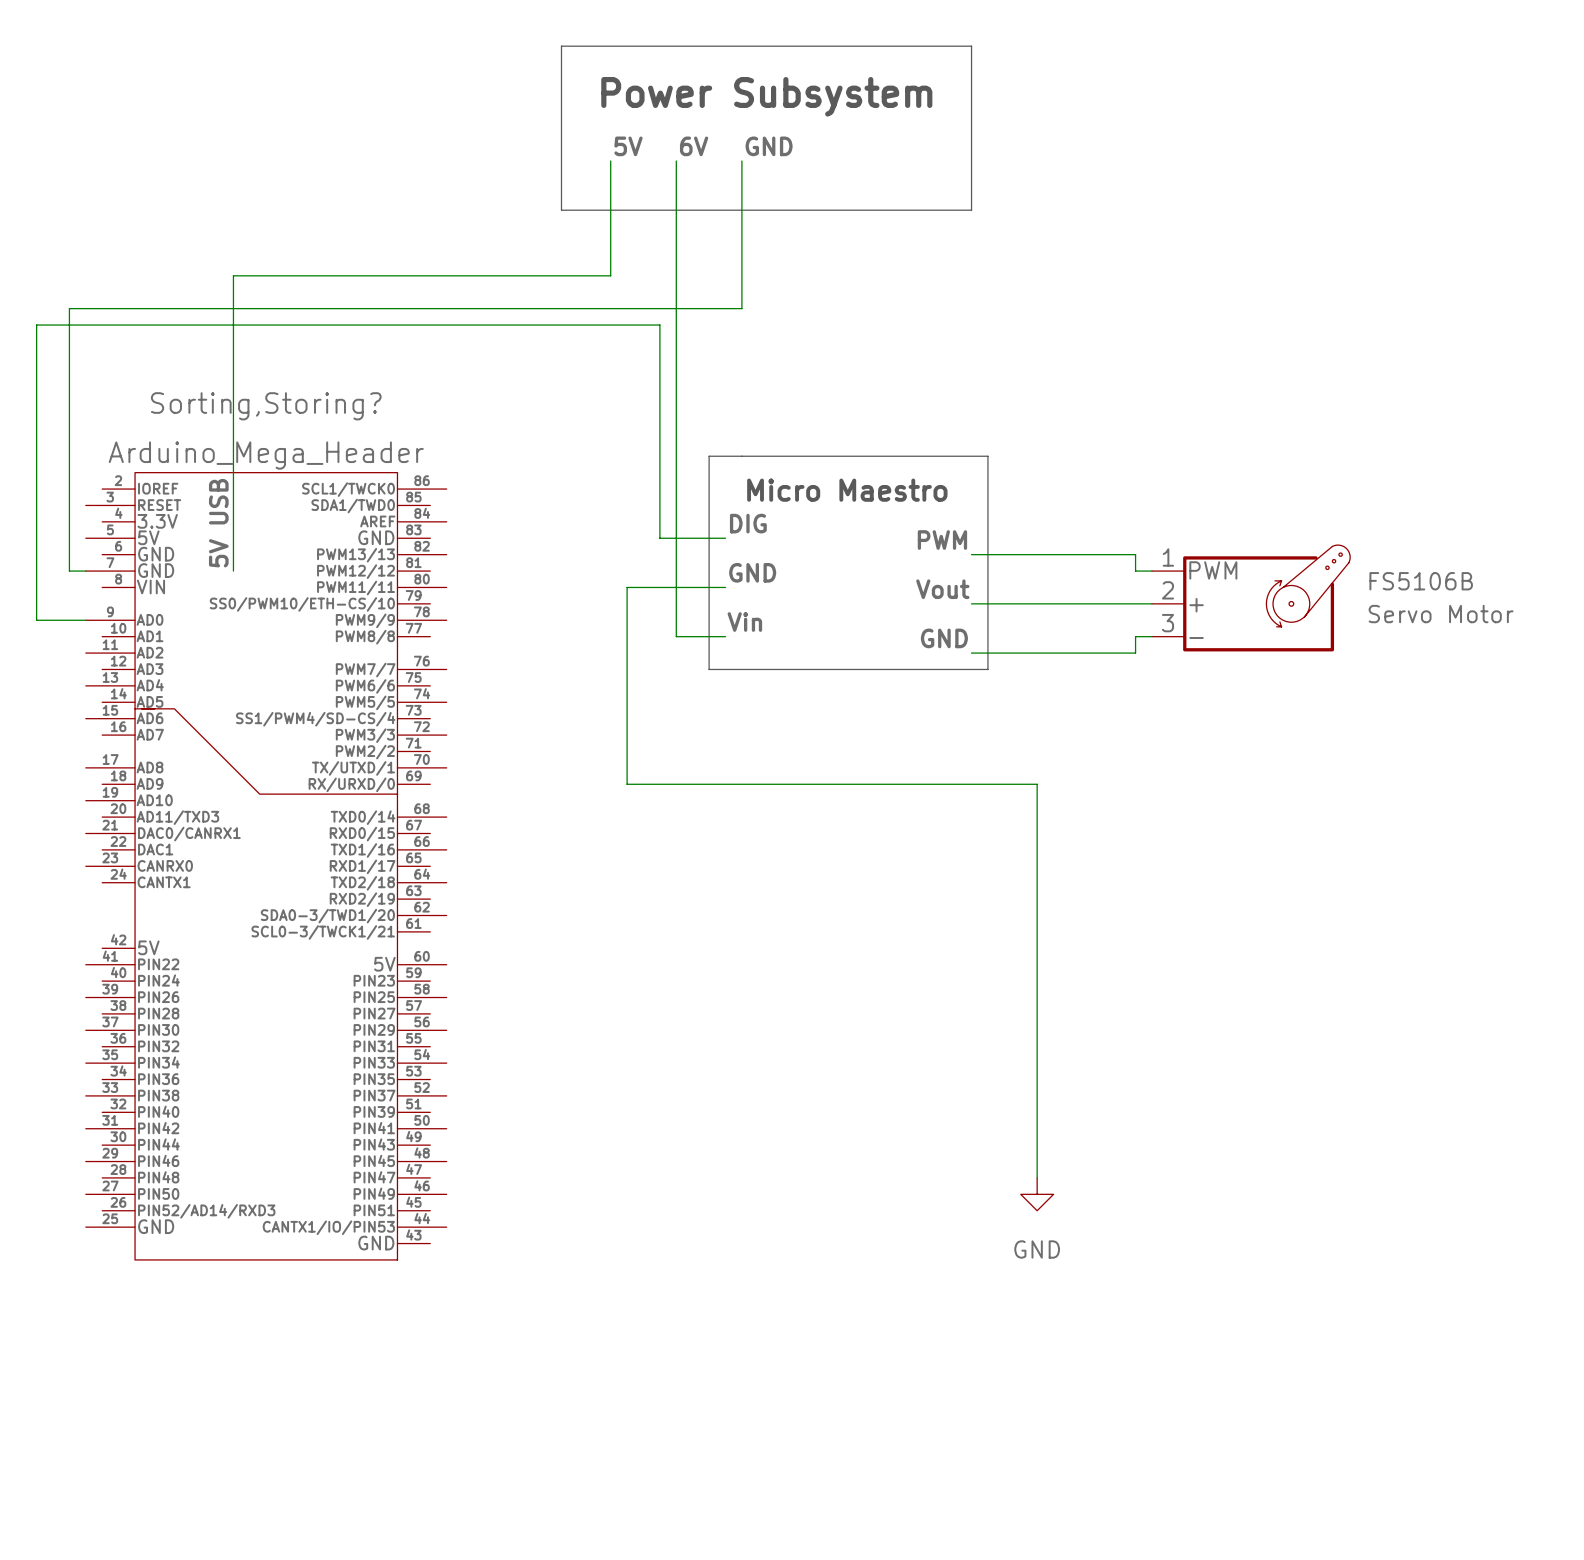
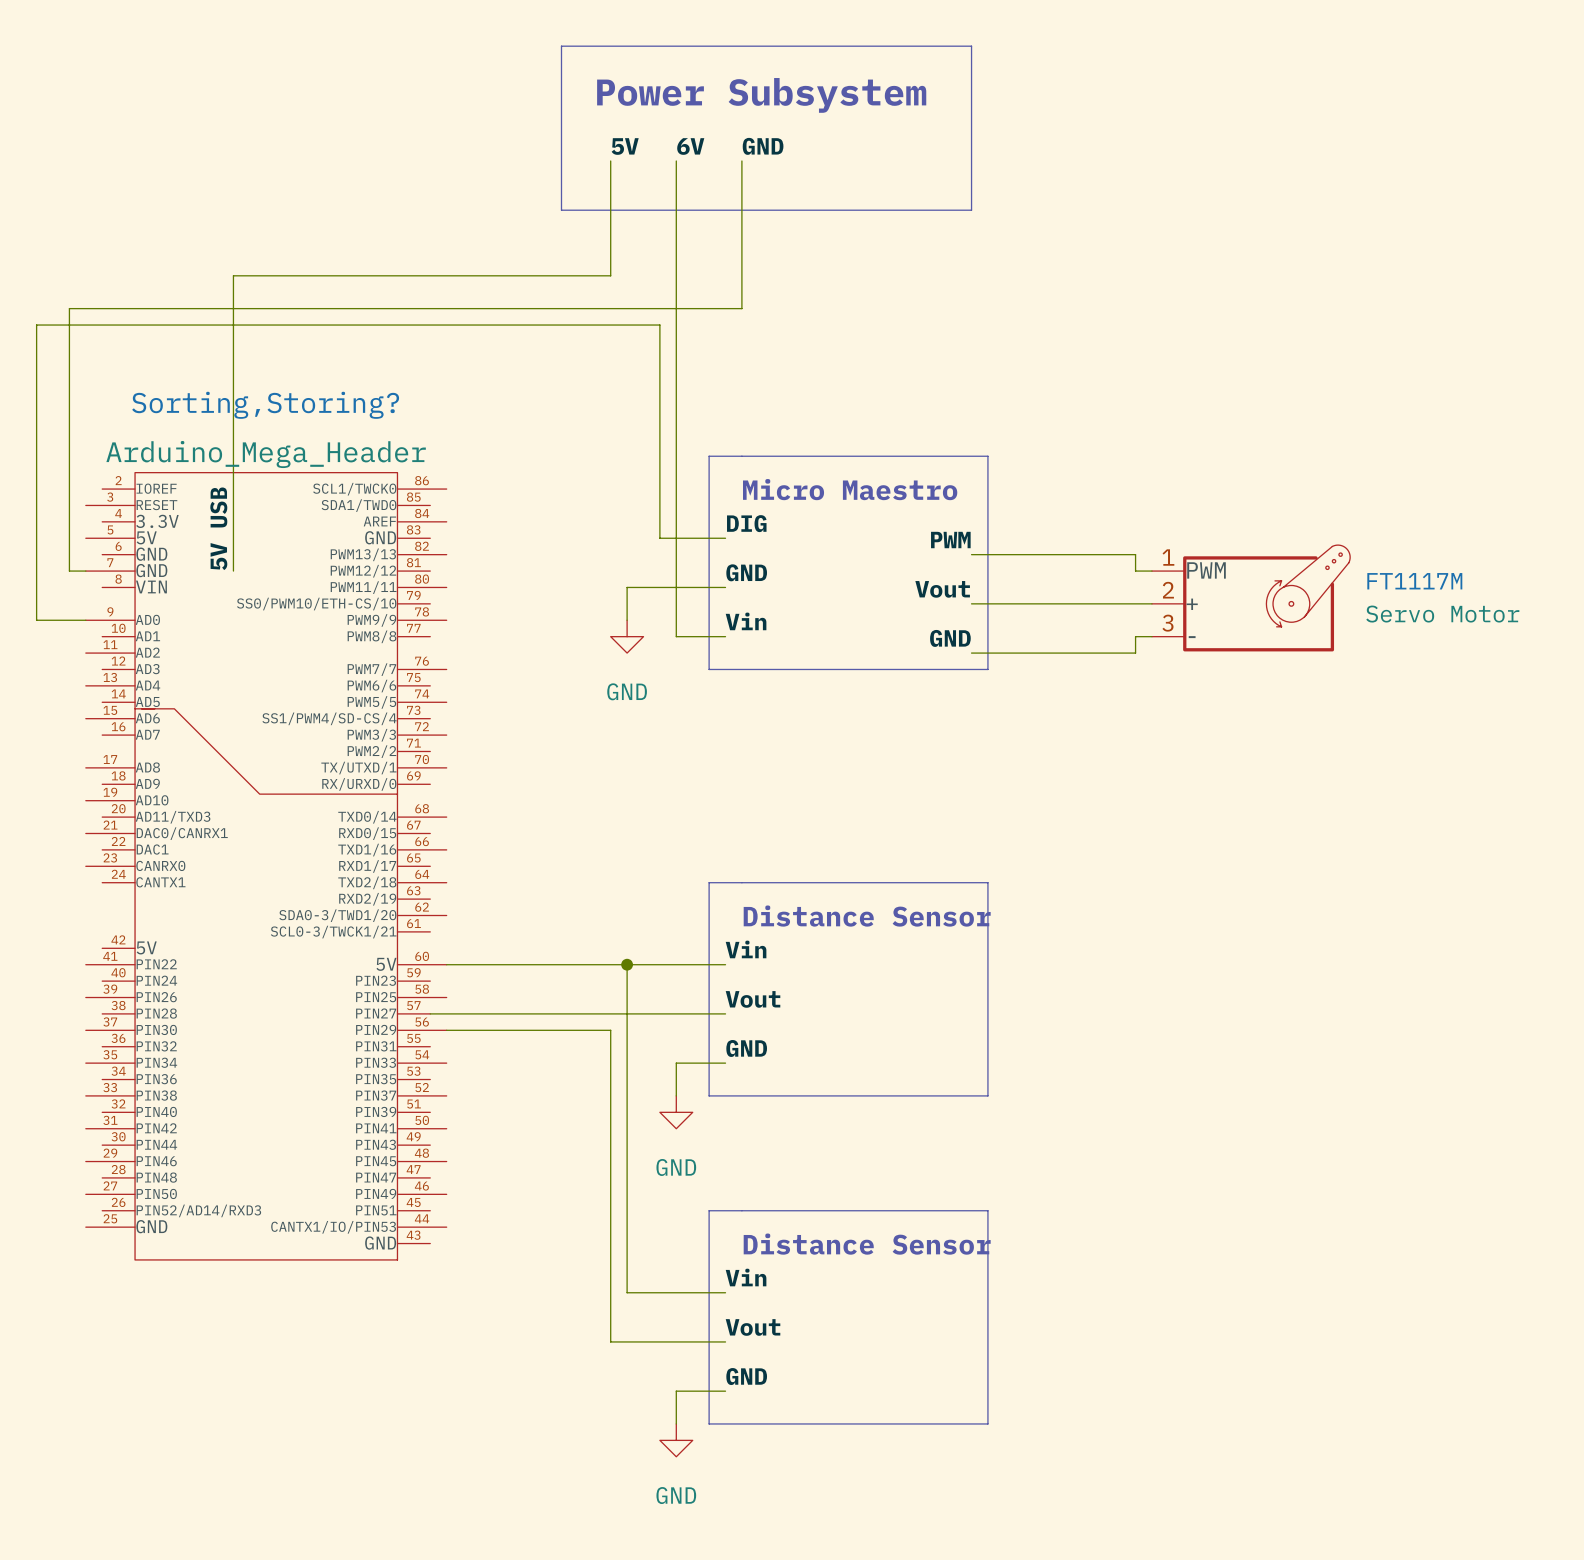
FS5106B name: FS5106B (1421, 581) -> FT1117M (1414, 581)
wire: (627, 620) (627, 784) (1037, 784) (1037, 1177) -> none
power symbol: none -> GND (627, 636)
line: none -> (709, 882) (709, 1095) (987, 1095) (987, 882) (709, 882)
text: none -> Distance Sensor (867, 916)
label: none -> Vin (746, 949)
wire: none -> (446, 964) (725, 964)
wire: none -> (627, 964) (627, 1292) (725, 1292)
junction: none -> (627, 964)
label: none -> Vout (753, 999)
wire: none -> (430, 1013) (725, 1013)
wire: none -> (446, 1030) (610, 1030) (610, 1341) (725, 1341)
label: none -> GND (746, 1048)
wire: none -> (725, 1063) (676, 1063) (676, 1095)
power symbol: none -> GND (676, 1112)
power symbol: GND (1037, 1194) -> none
line: none -> (709, 1210) (709, 1423) (987, 1423) (987, 1210) (709, 1210)
text: none -> Distance Sensor (867, 1244)
label: none -> Vin (746, 1277)
label: none -> Vout (753, 1327)
label: none -> GND (746, 1376)
wire: none -> (725, 1391) (676, 1391) (676, 1423)
power symbol: none -> GND (676, 1440)

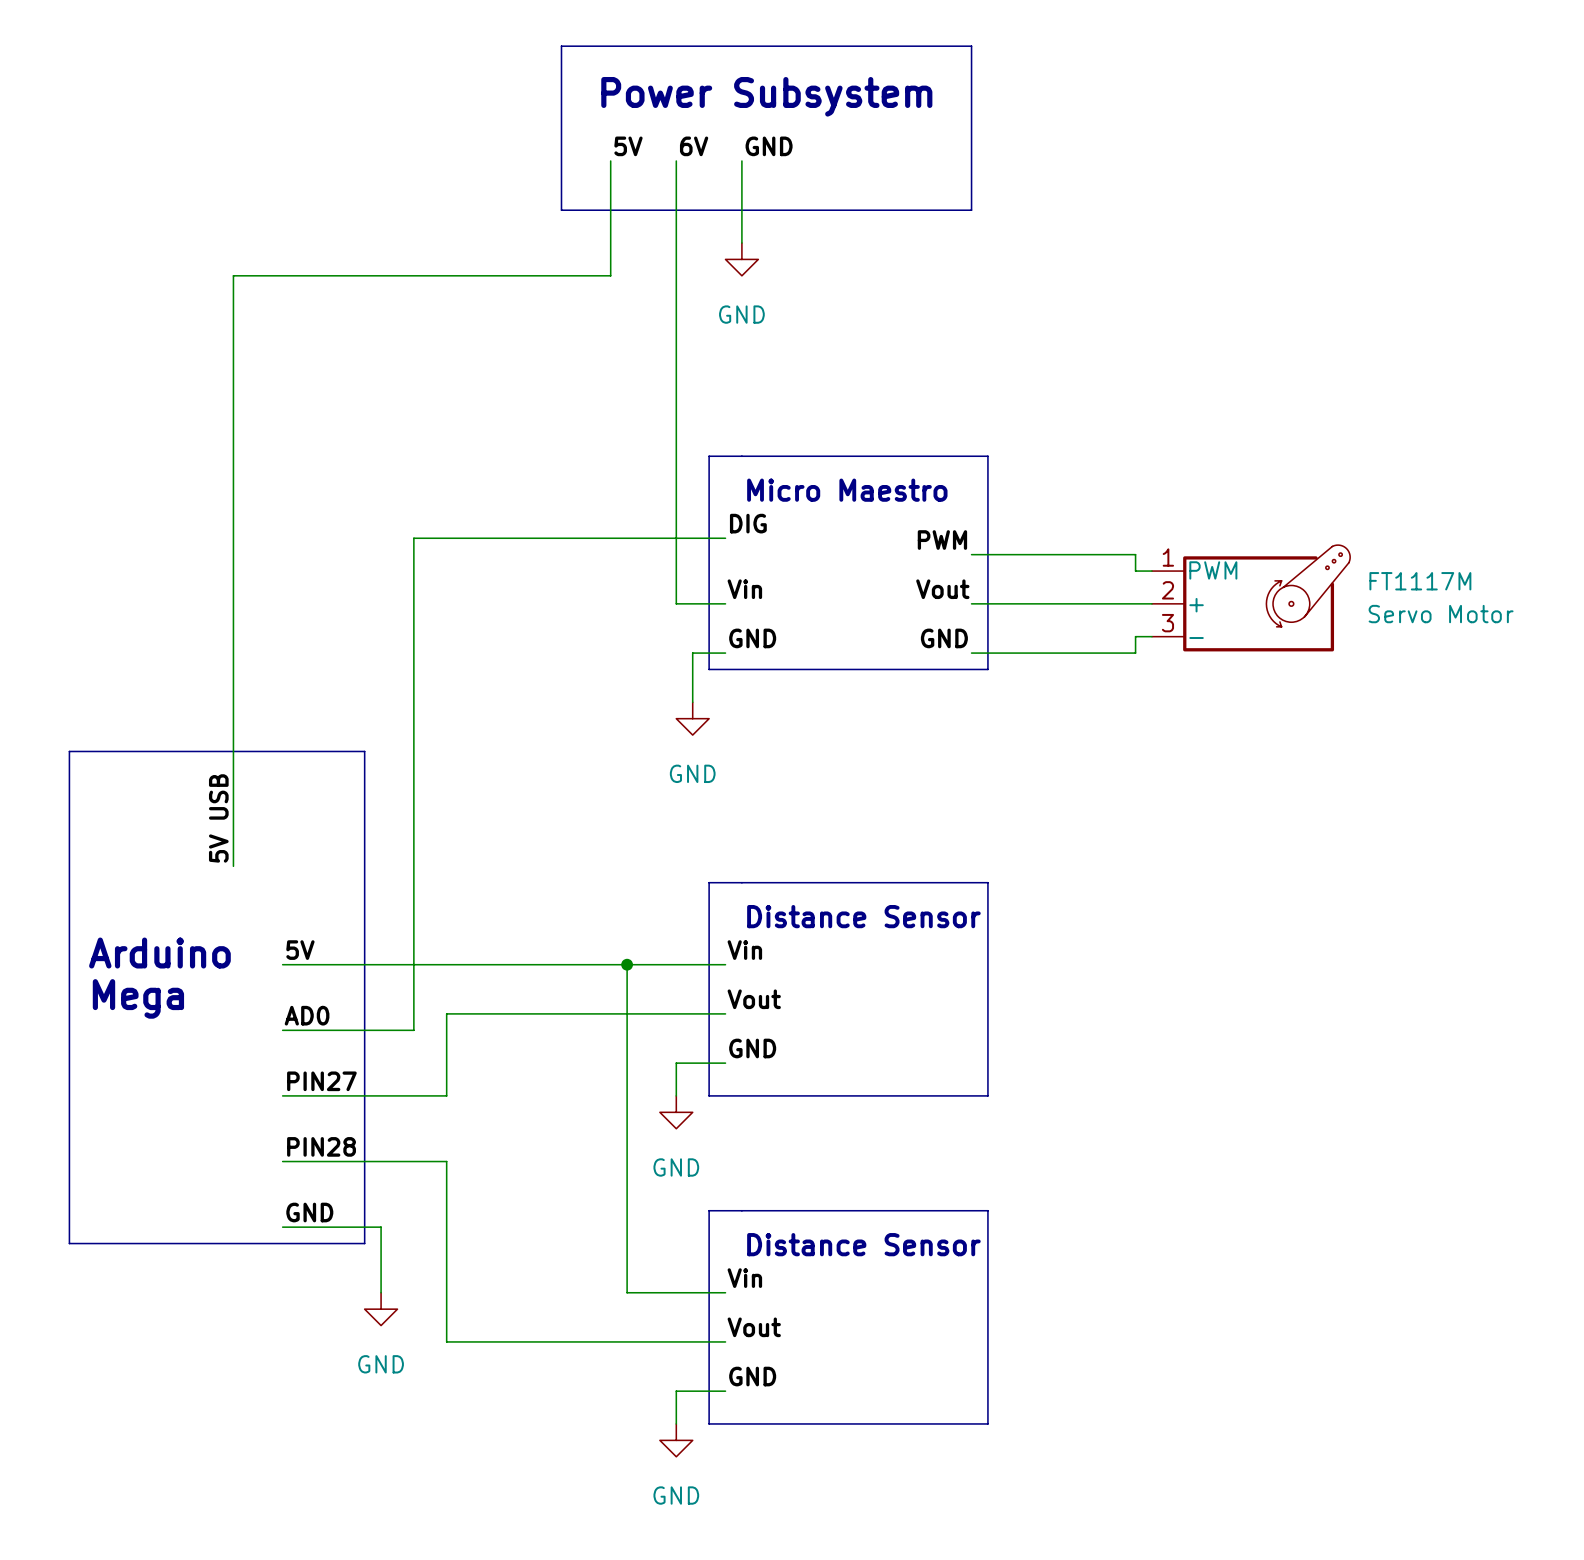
wire: (741, 243) (741, 308) (69, 308) (69, 571) (85, 571) -> none
power symbol: none -> GND (741, 259)
label position: 5V USB (218, 528) -> 5V USB (218, 818)
wire: (659, 538) (659, 325) (36, 325) (36, 620) (85, 620) -> (659, 538) (413, 538) (413, 1030) (282, 1030)
wire: none -> (233, 571) (233, 866)
label position: GND (746, 572) -> GND (752, 638)
wire: (725, 587) (627, 587) (627, 620) -> none
wire: (676, 603) (676, 636) (725, 636) -> (676, 603) (725, 603)
label position: Vin (746, 621) -> Vin (744, 589)
power symbol position: GND (627, 636) -> GND (692, 718)
wire: none -> (725, 653) (692, 653) (692, 702)
line: none -> (69, 751) (69, 1243) (364, 1243) (364, 751) (69, 751)
Sorting,Storing?: Arduino_Mega_Header (266, 866) -> none
label: none -> 5V (300, 950)
text: none -> Arduino (159, 953)
wire: none -> (282, 964) (446, 964)
text: none -> Mega (138, 998)
wire: (430, 1013) (446, 1013) -> (282, 1095) (446, 1095) (446, 1013)
label: none -> AD0 (307, 1015)
wire: (446, 1030) (610, 1030) (610, 1341) -> (282, 1161) (446, 1161) (446, 1341) (610, 1341)
label: none -> PIN27 (321, 1081)
label: none -> PIN28 (321, 1146)
label: none -> GND (309, 1212)
wire: none -> (282, 1227) (381, 1227) (381, 1292)
power symbol: none -> GND (381, 1309)

